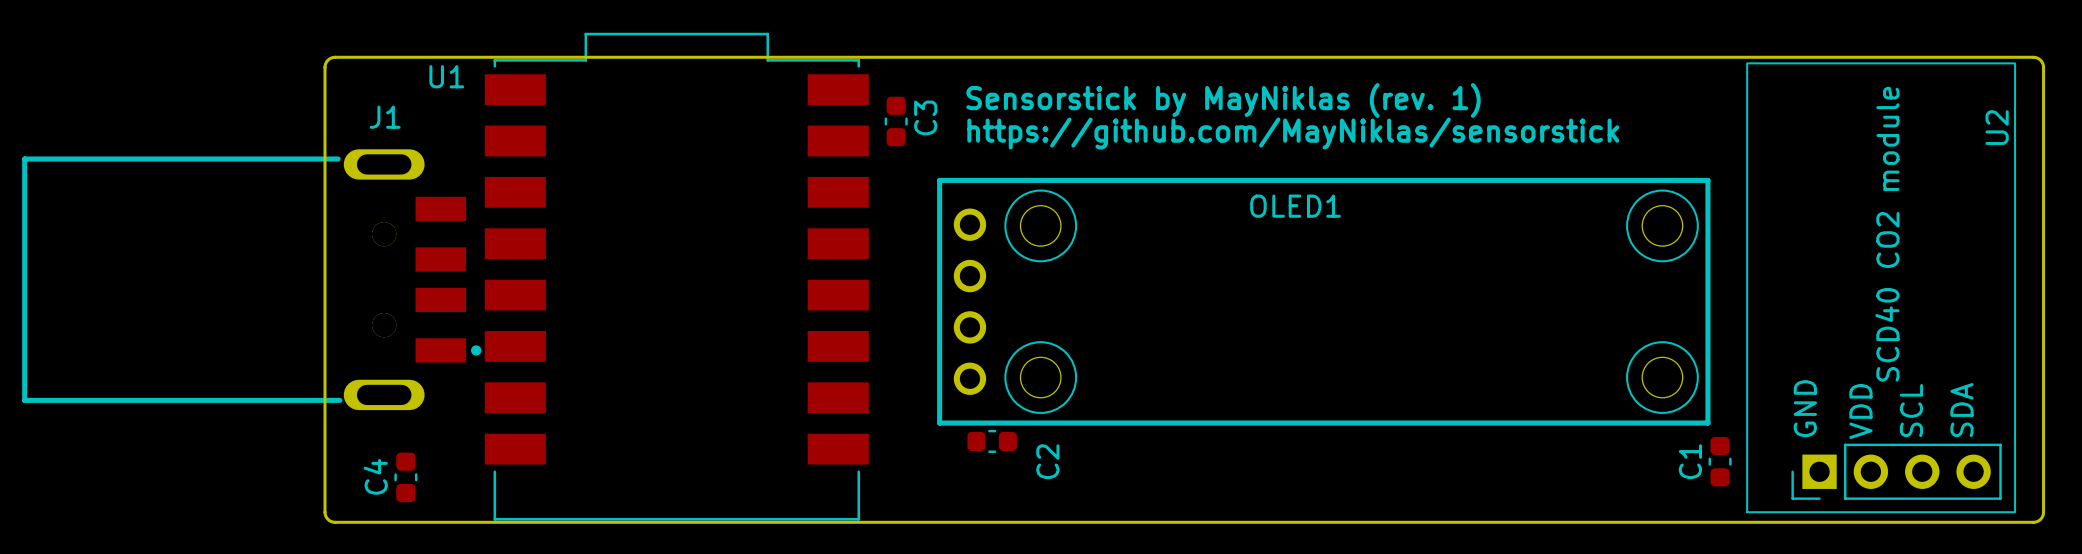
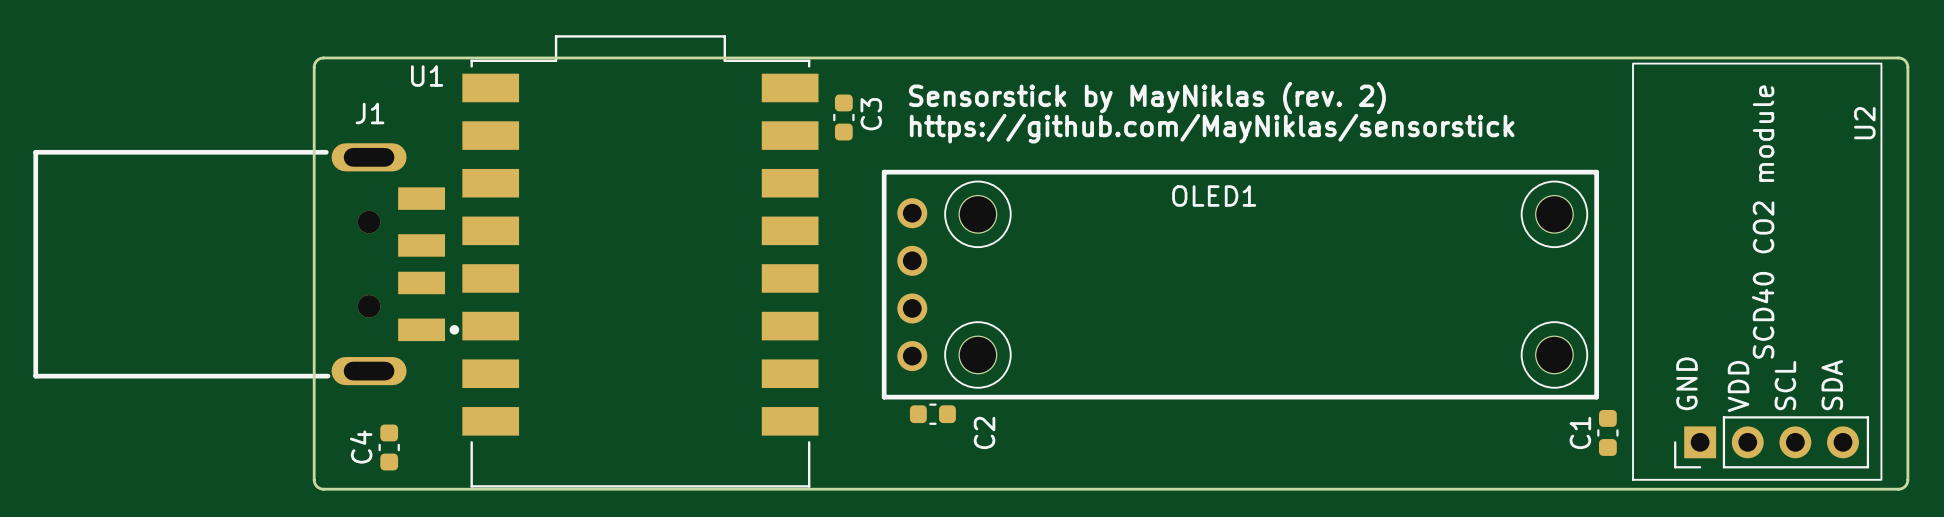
text: Sensorstick by MayNiklas (rev. 1) (1223, 100) -> Sensorstick by MayNiklas (rev. 2) (1147, 98)

